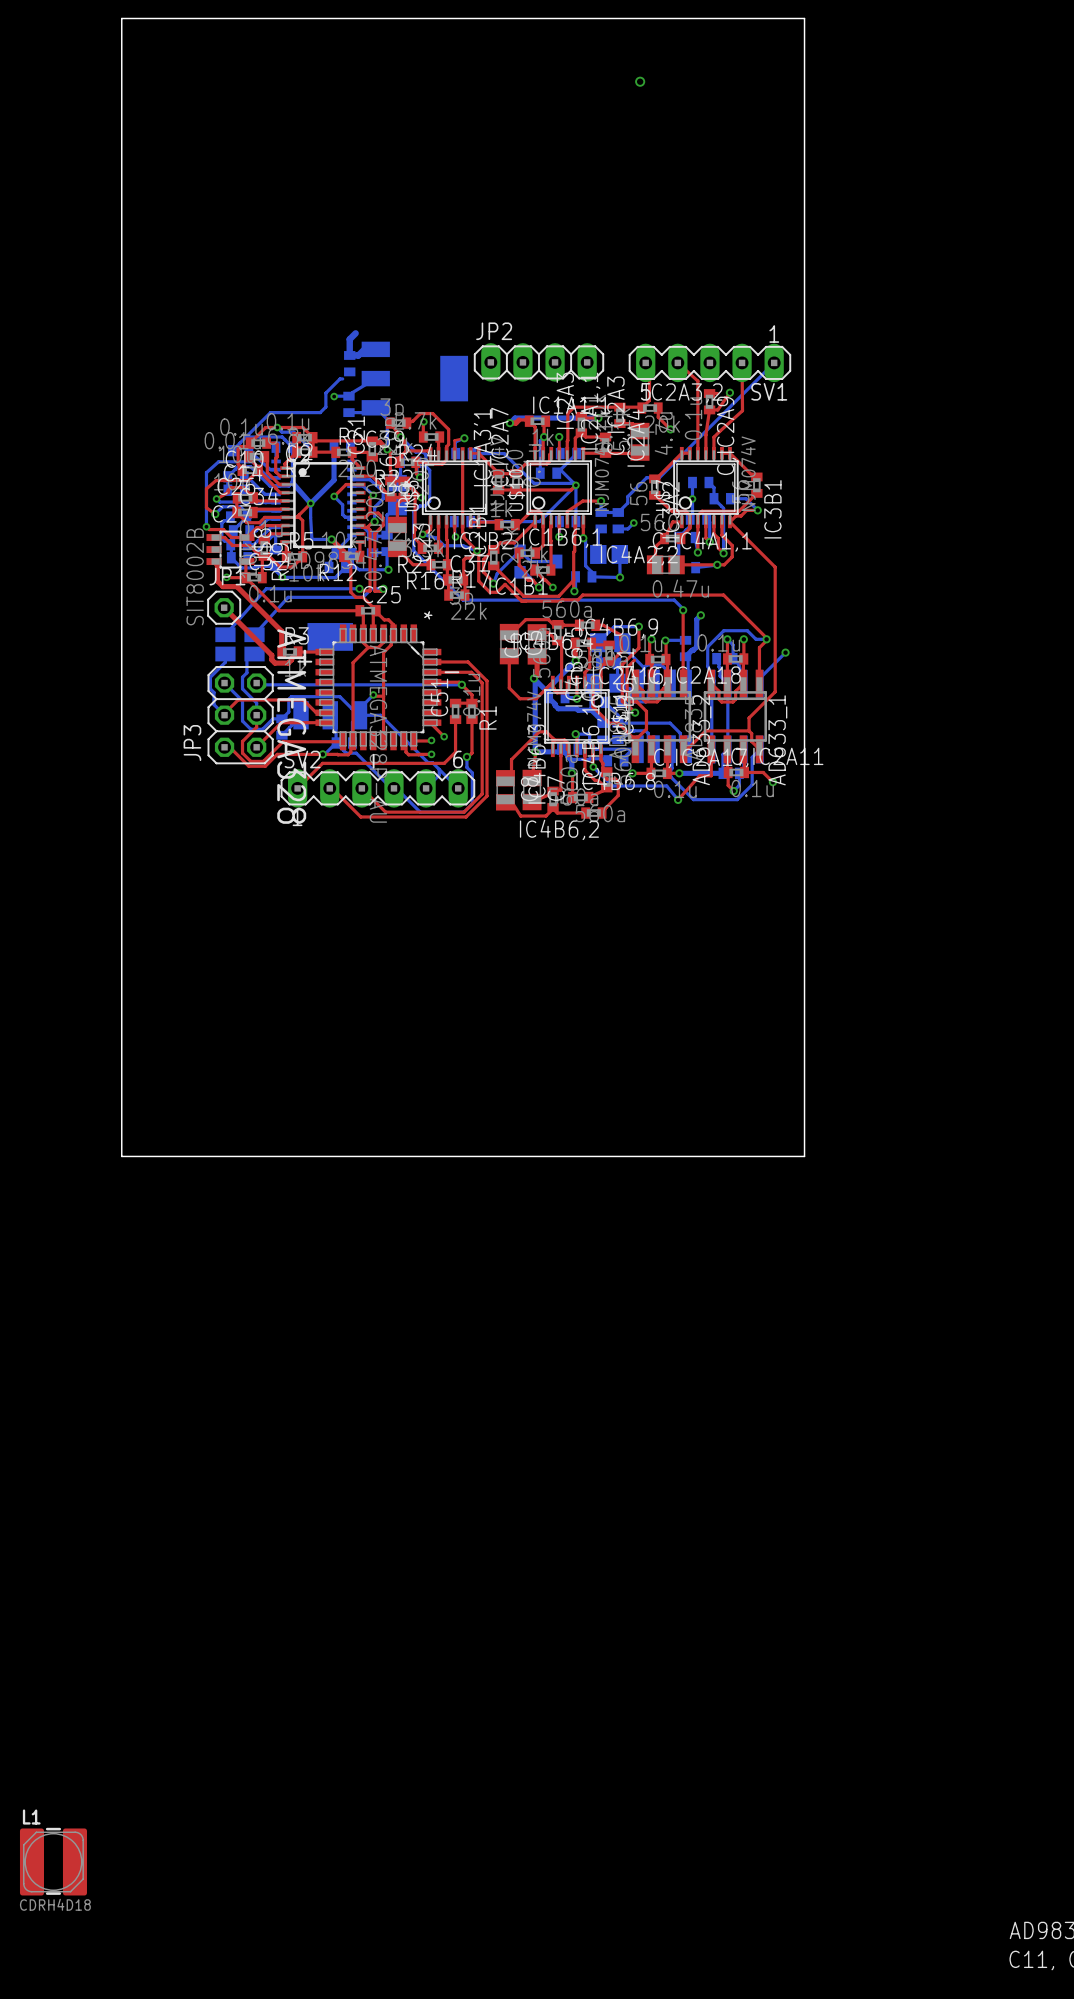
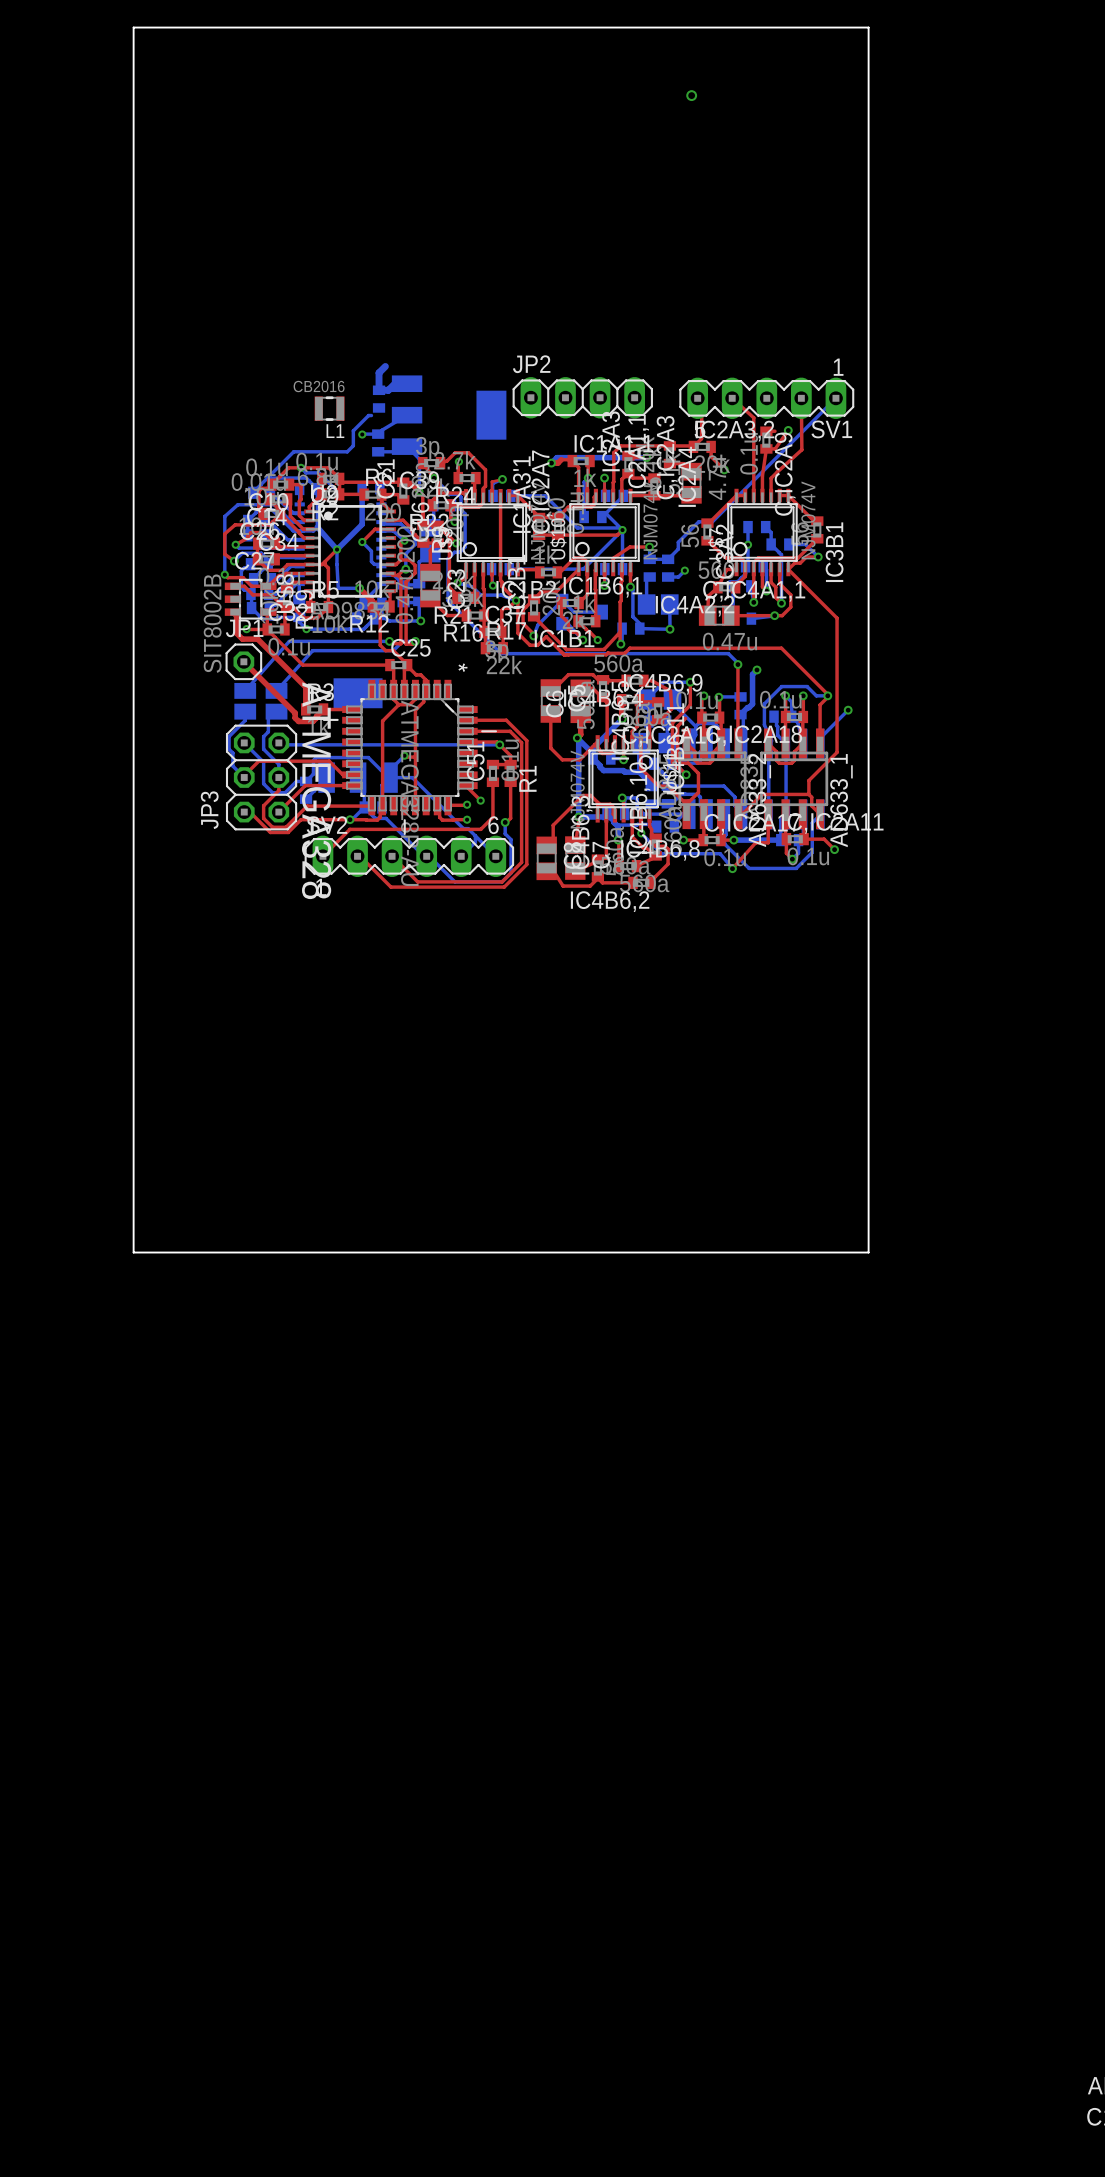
L1 name position: L1 (31, 1817) -> L1 (335, 431)
L1 footprint: [19, 1827, 87, 1896] -> [314, 396, 345, 421]
L1 value: CDRH4D18 (55, 1904) -> CB2016 (319, 386)

